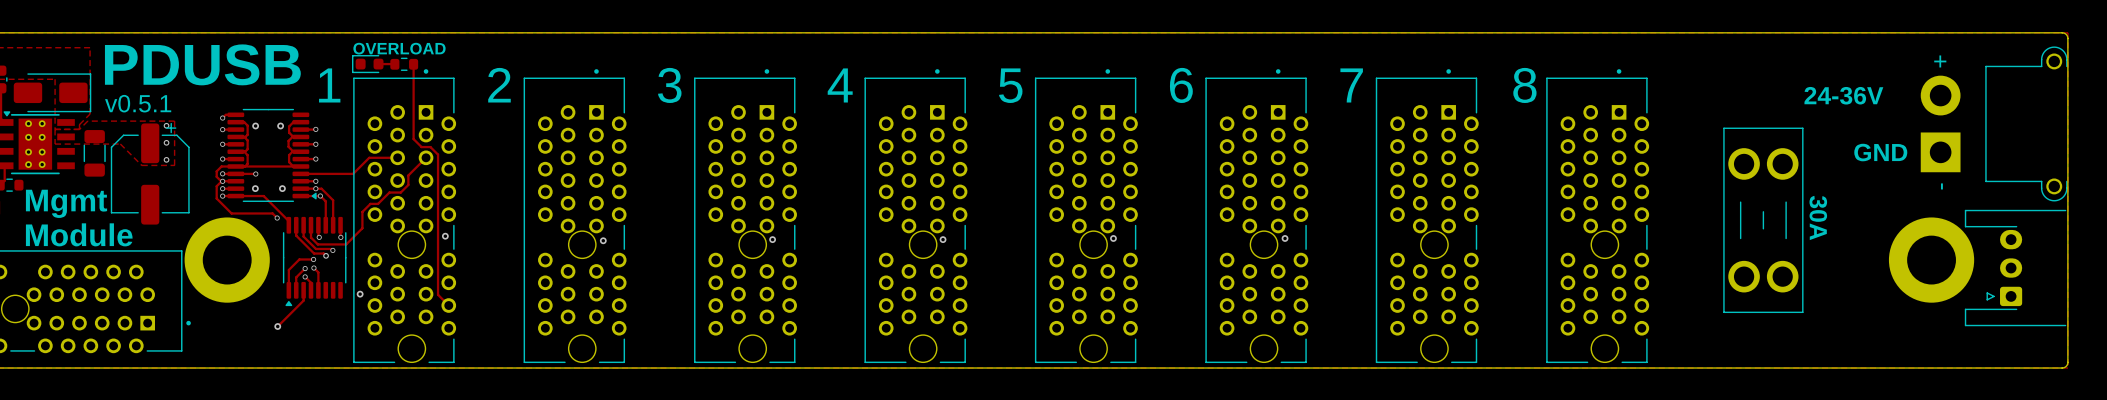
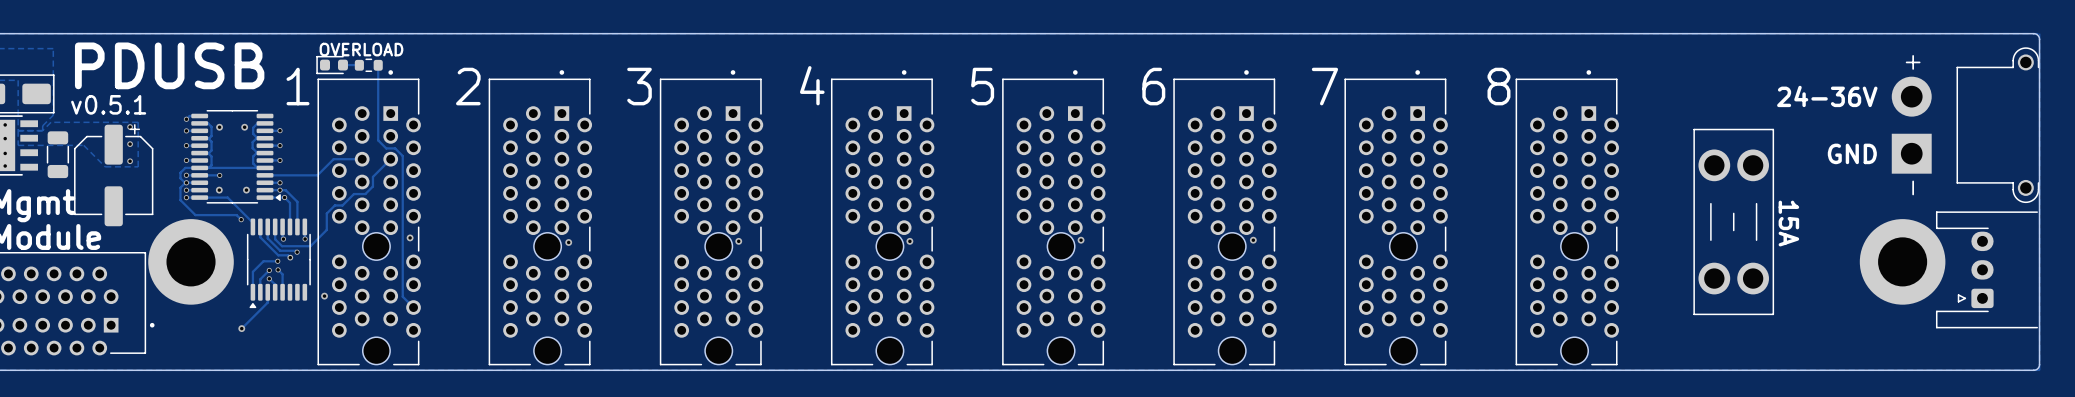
text: 30A (1818, 217) -> 15A (1788, 223)

